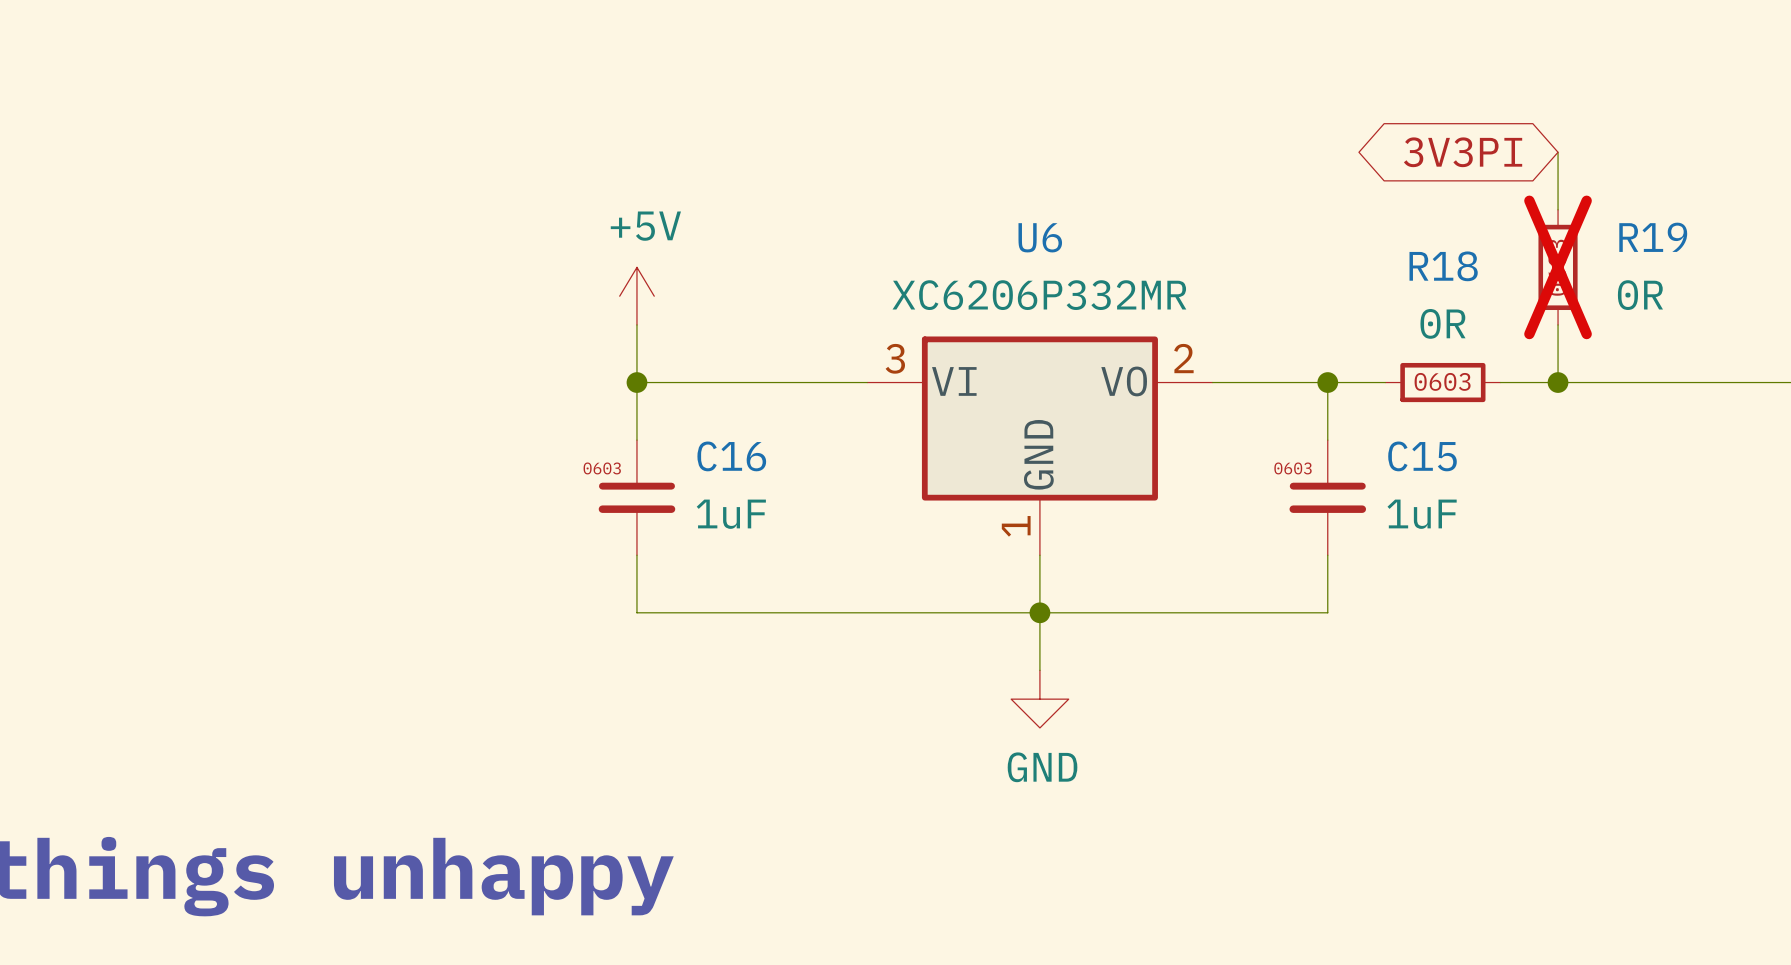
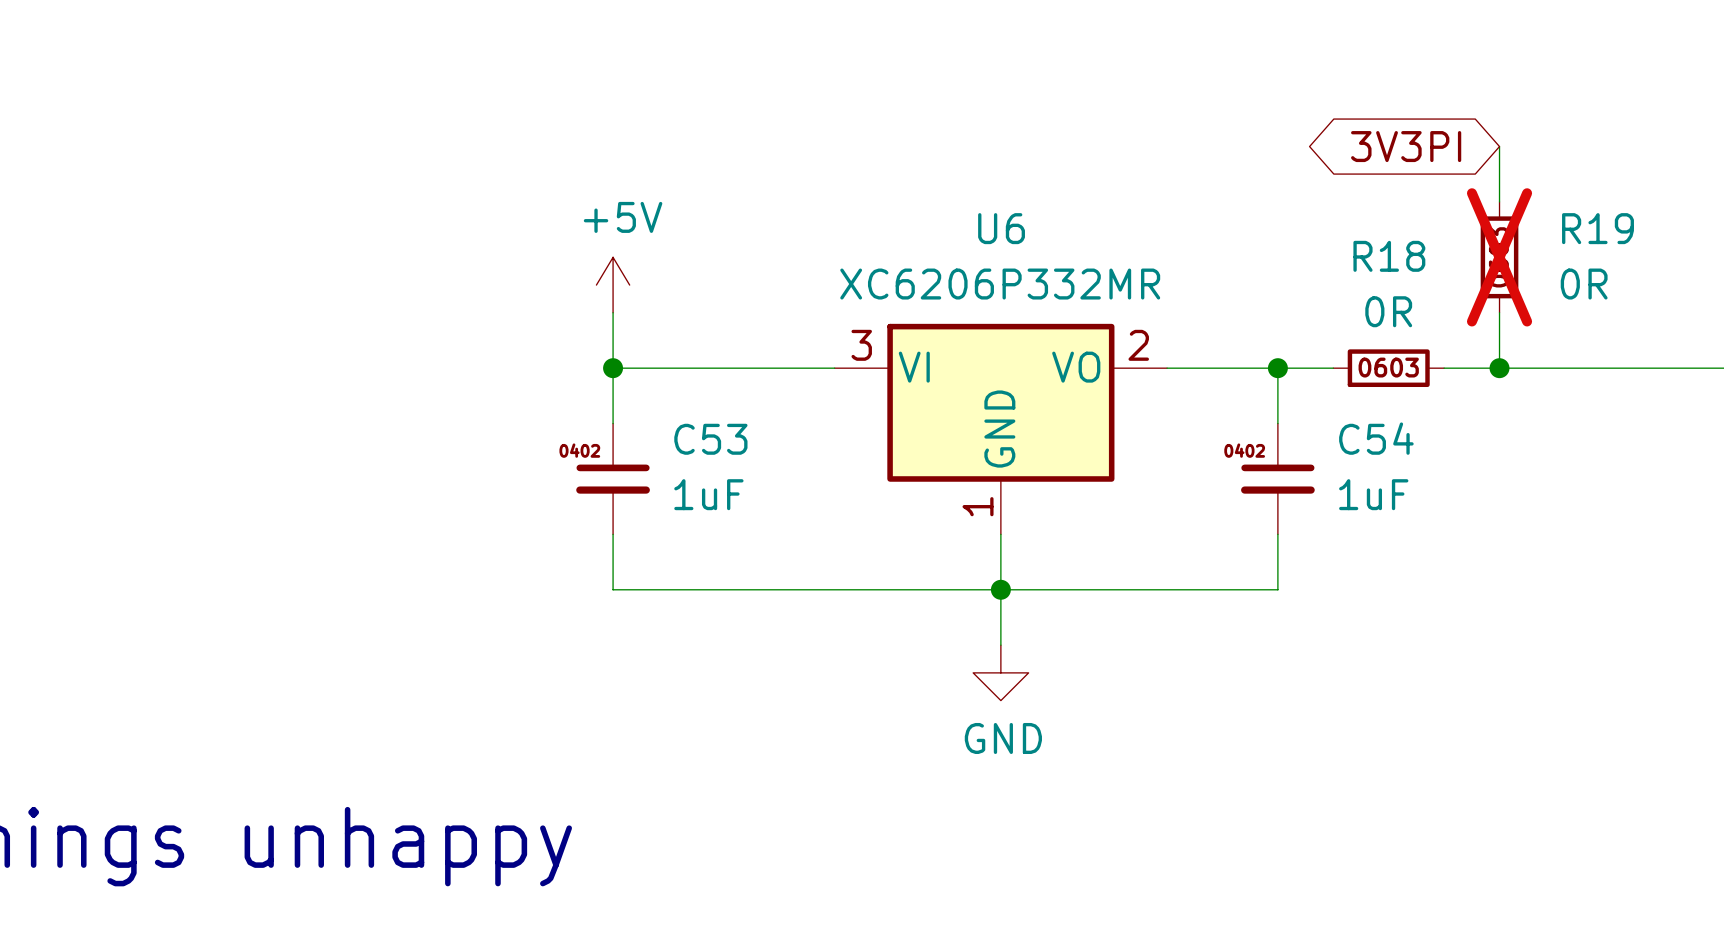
C16 name: C16 (731, 456) -> C53 (710, 439)
C15 name: C15 (1422, 456) -> C54 (1376, 438)
C16 text: 0603 (602, 468) -> 0402 (579, 450)
C15 text: 0603 (1293, 468) -> 0402 (1244, 450)

